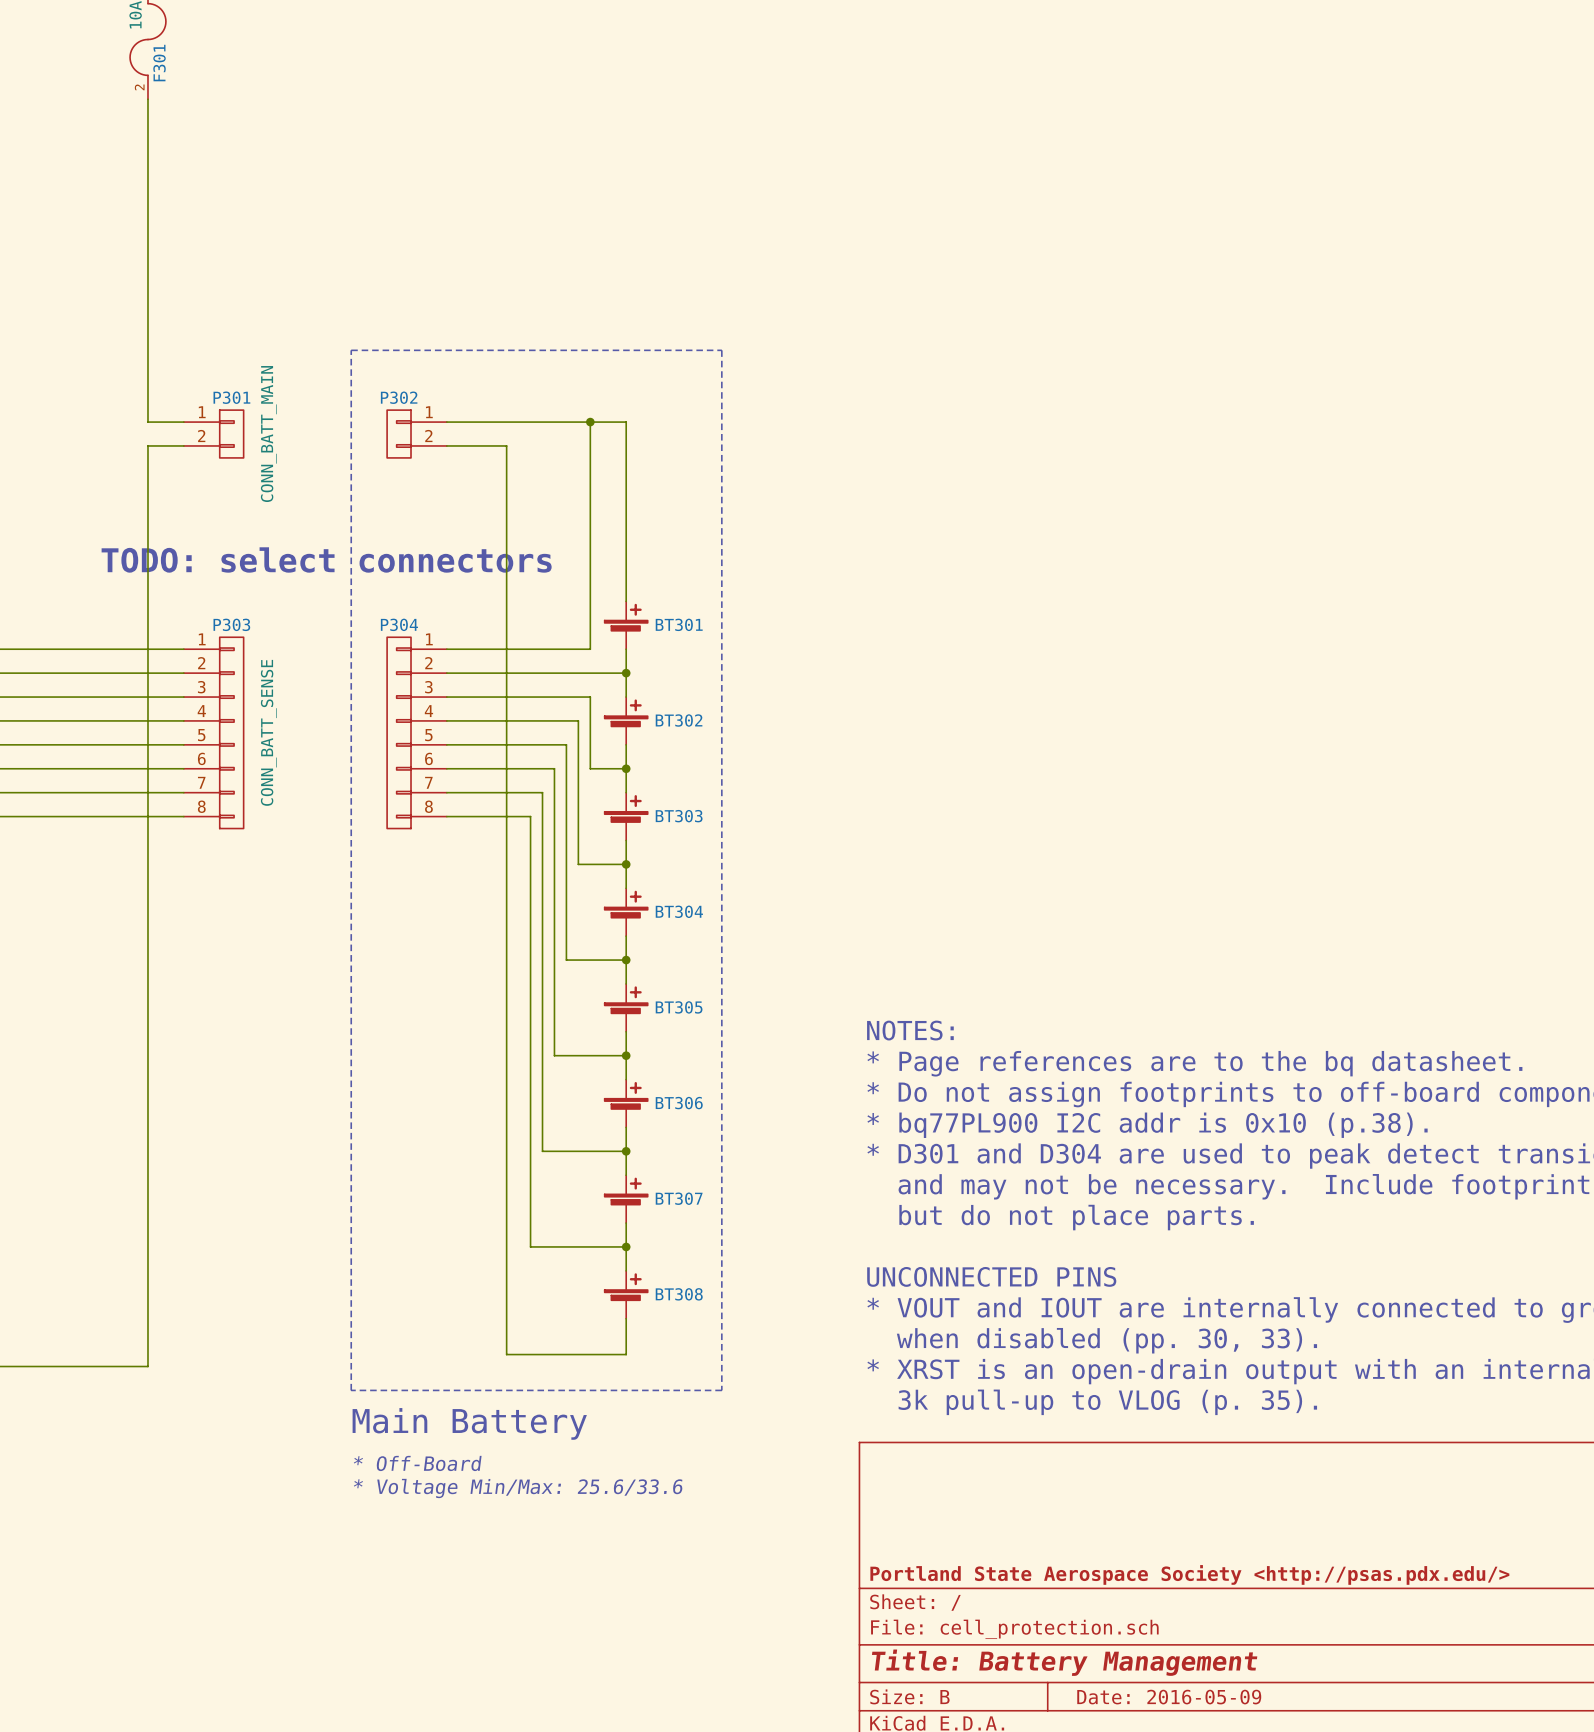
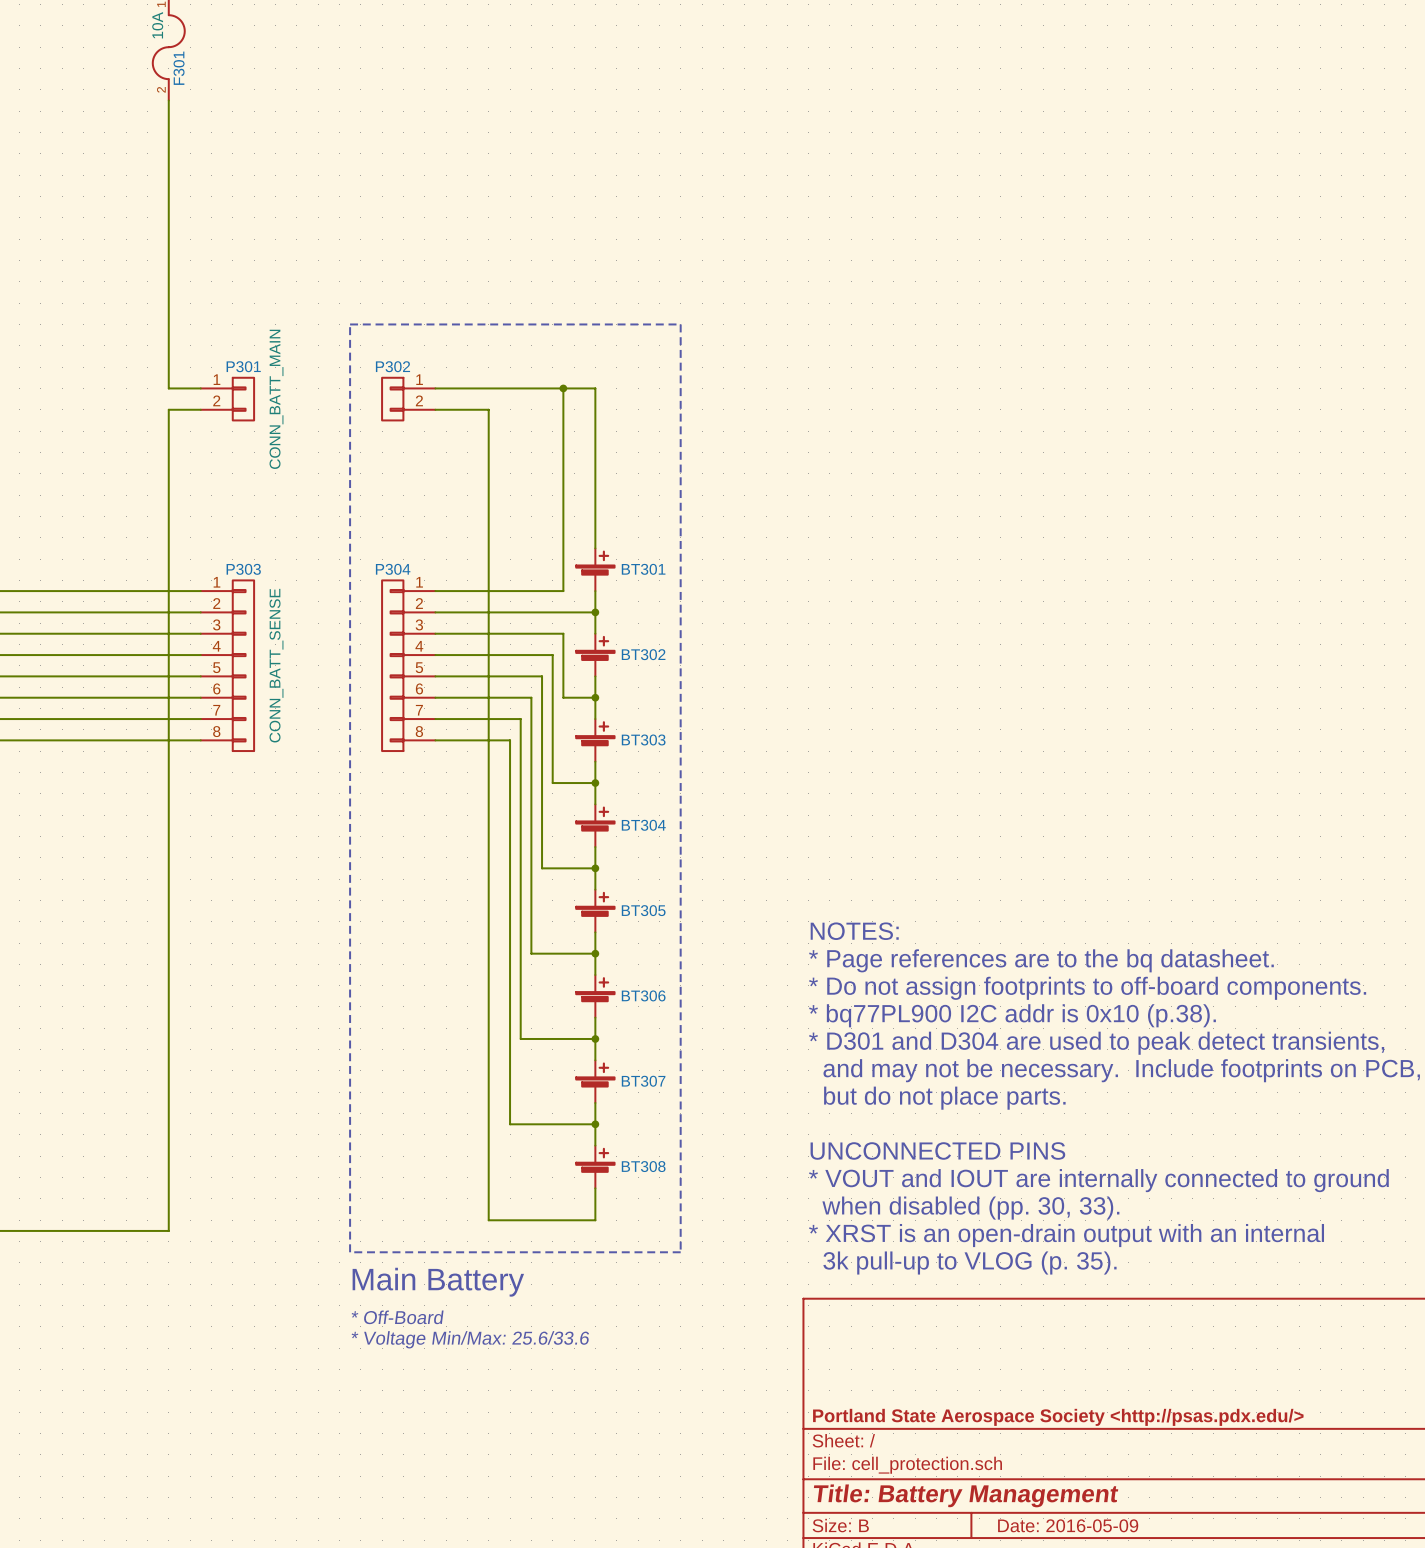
text: TODO: select connectors (326, 559) -> none

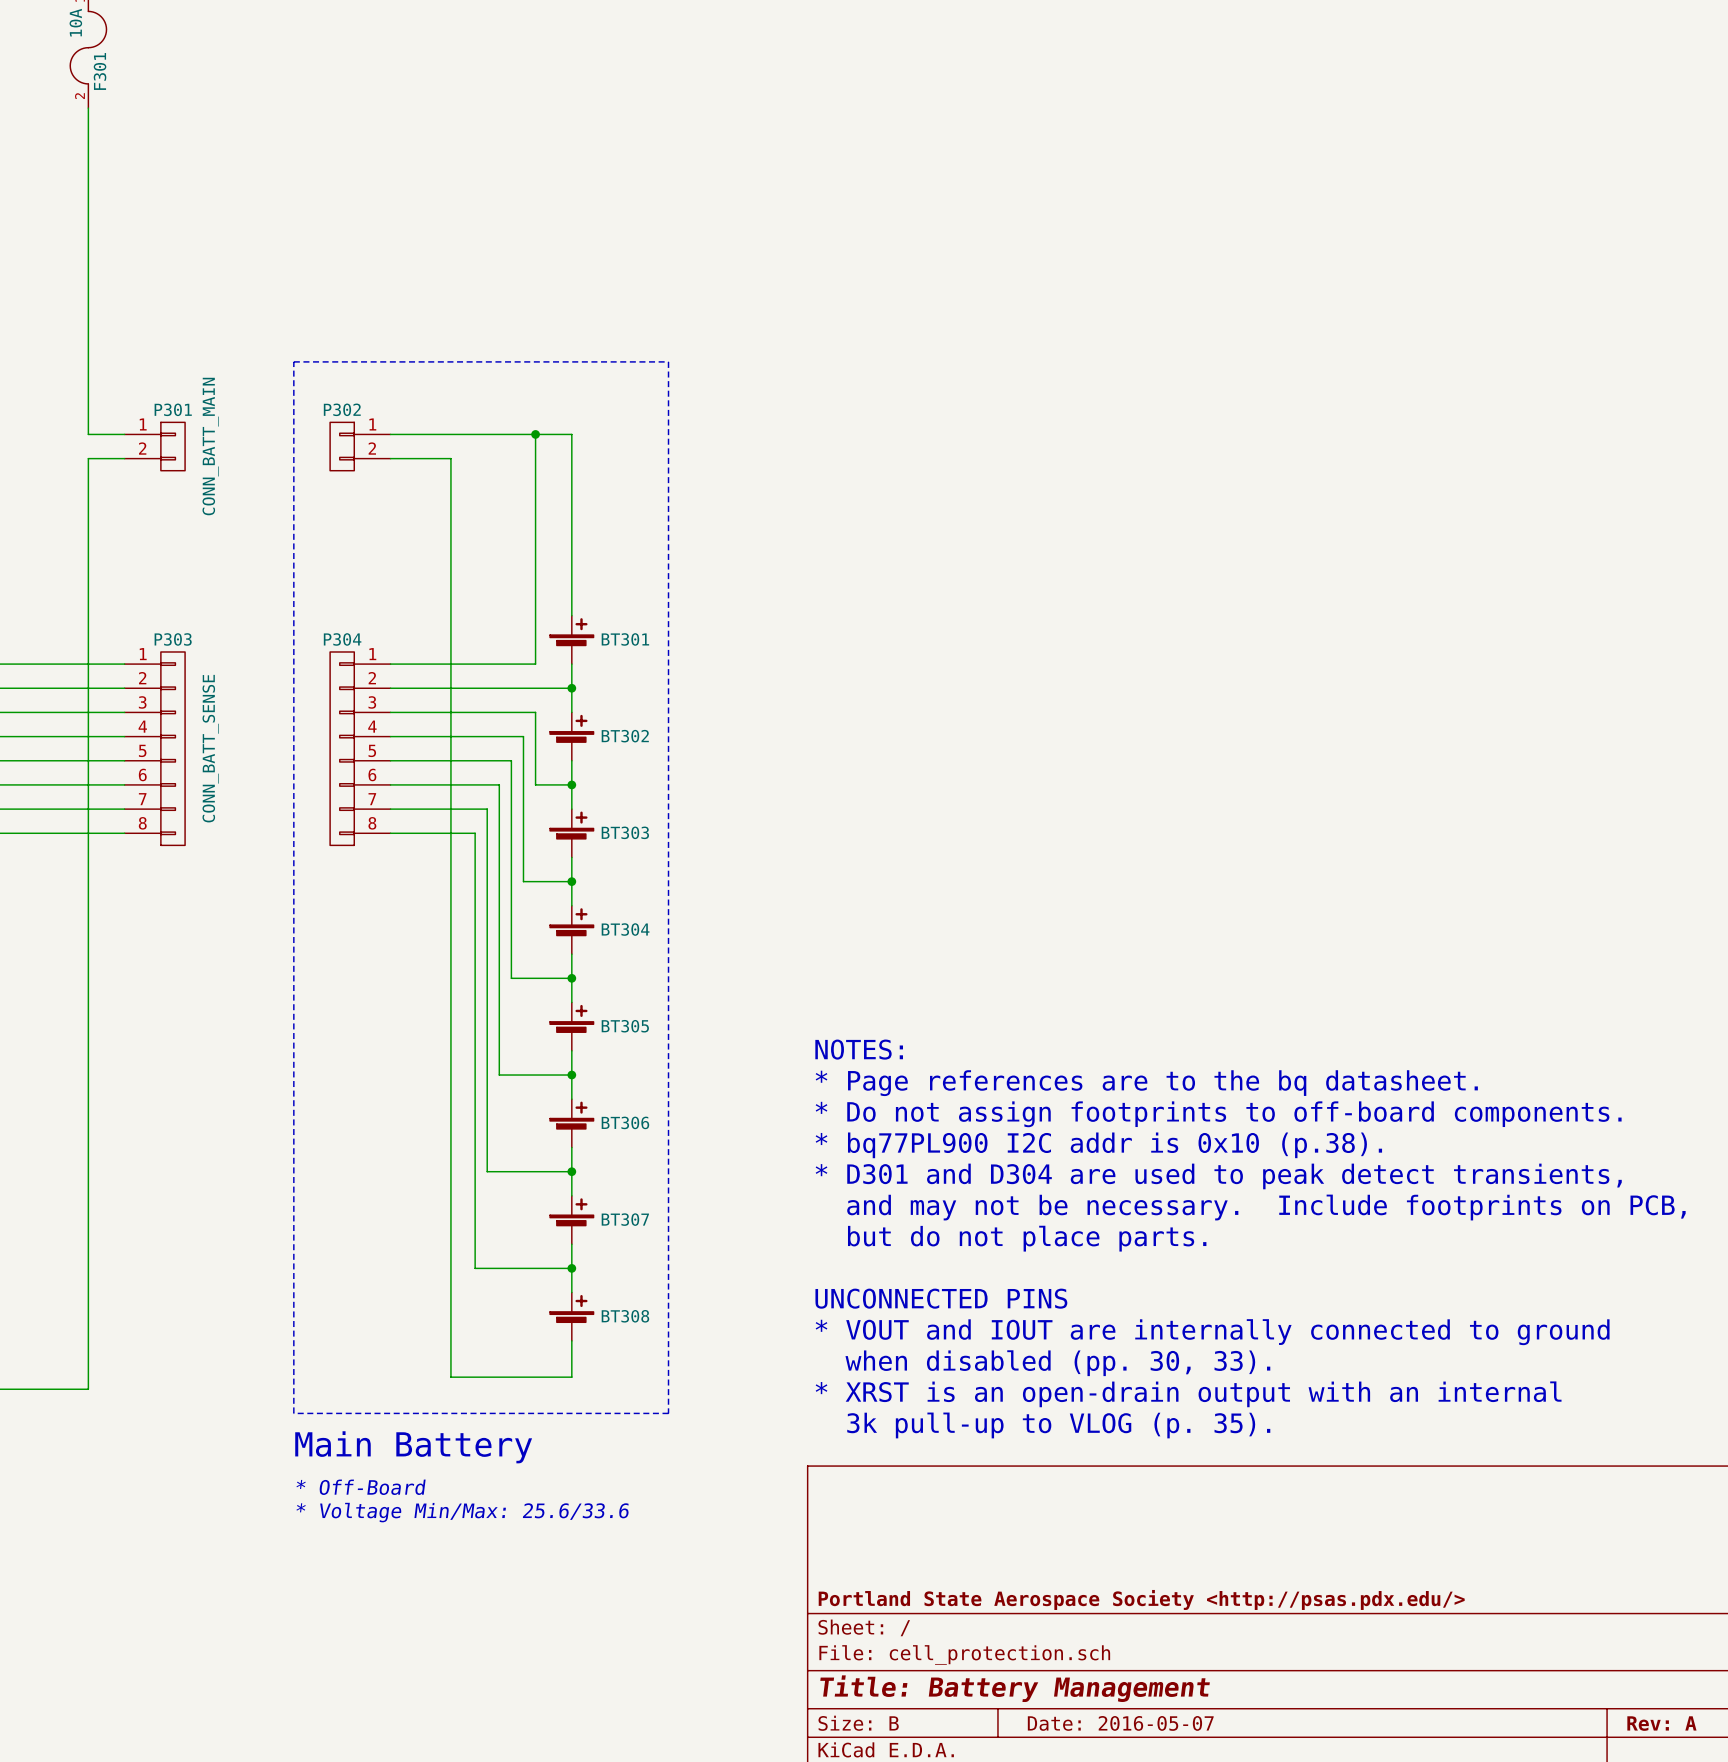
title block: Date: 2016-05-09 (1068, 1525) -> Date: 2016-05-07 (1120, 1723)

